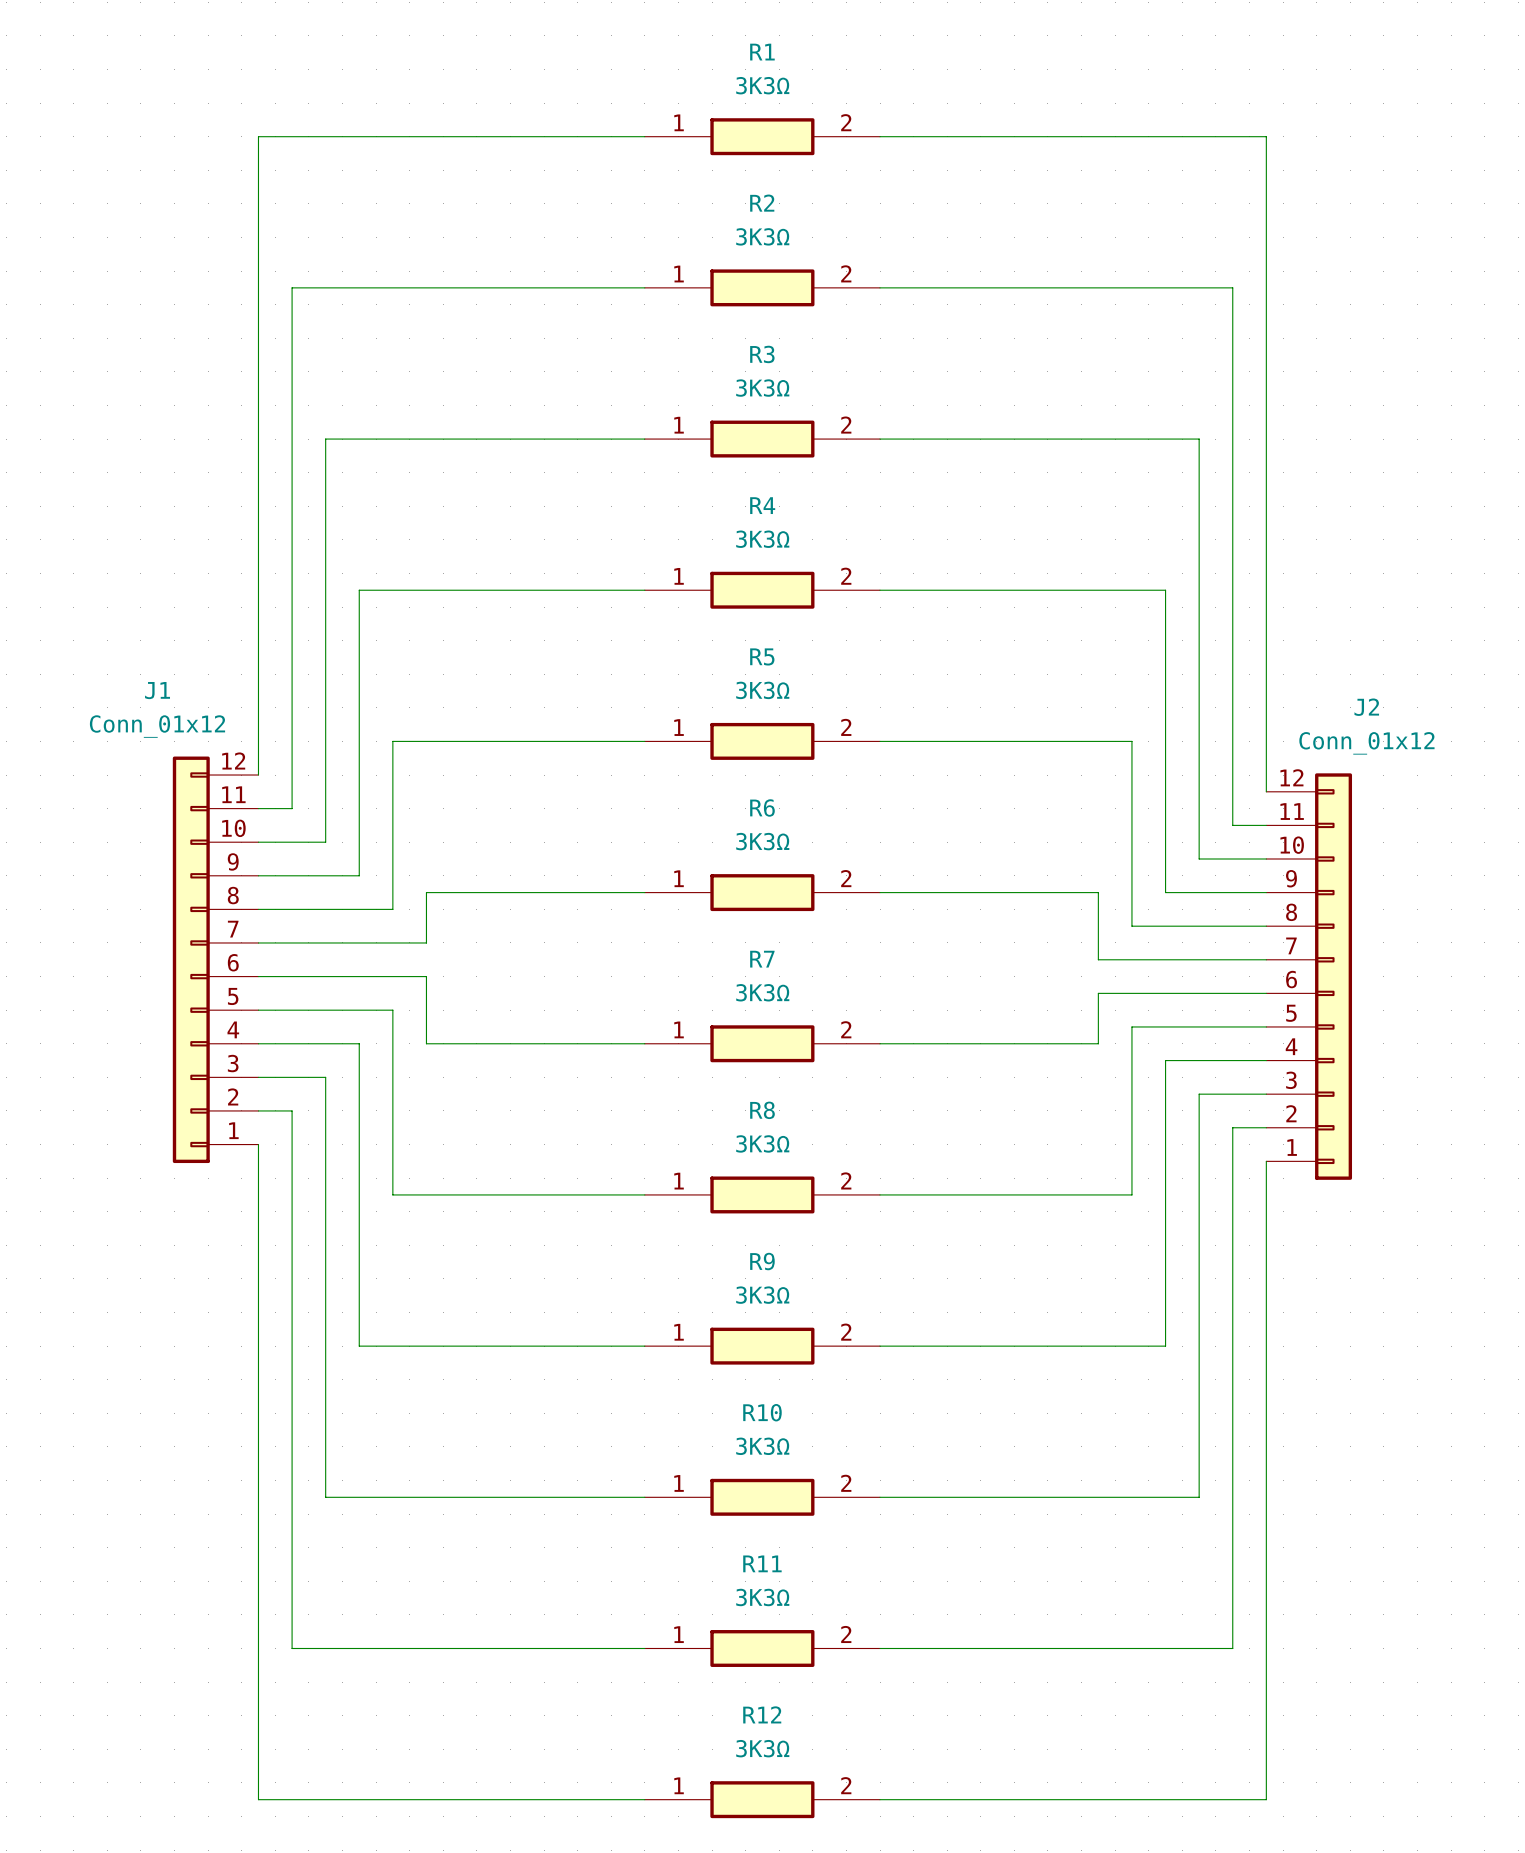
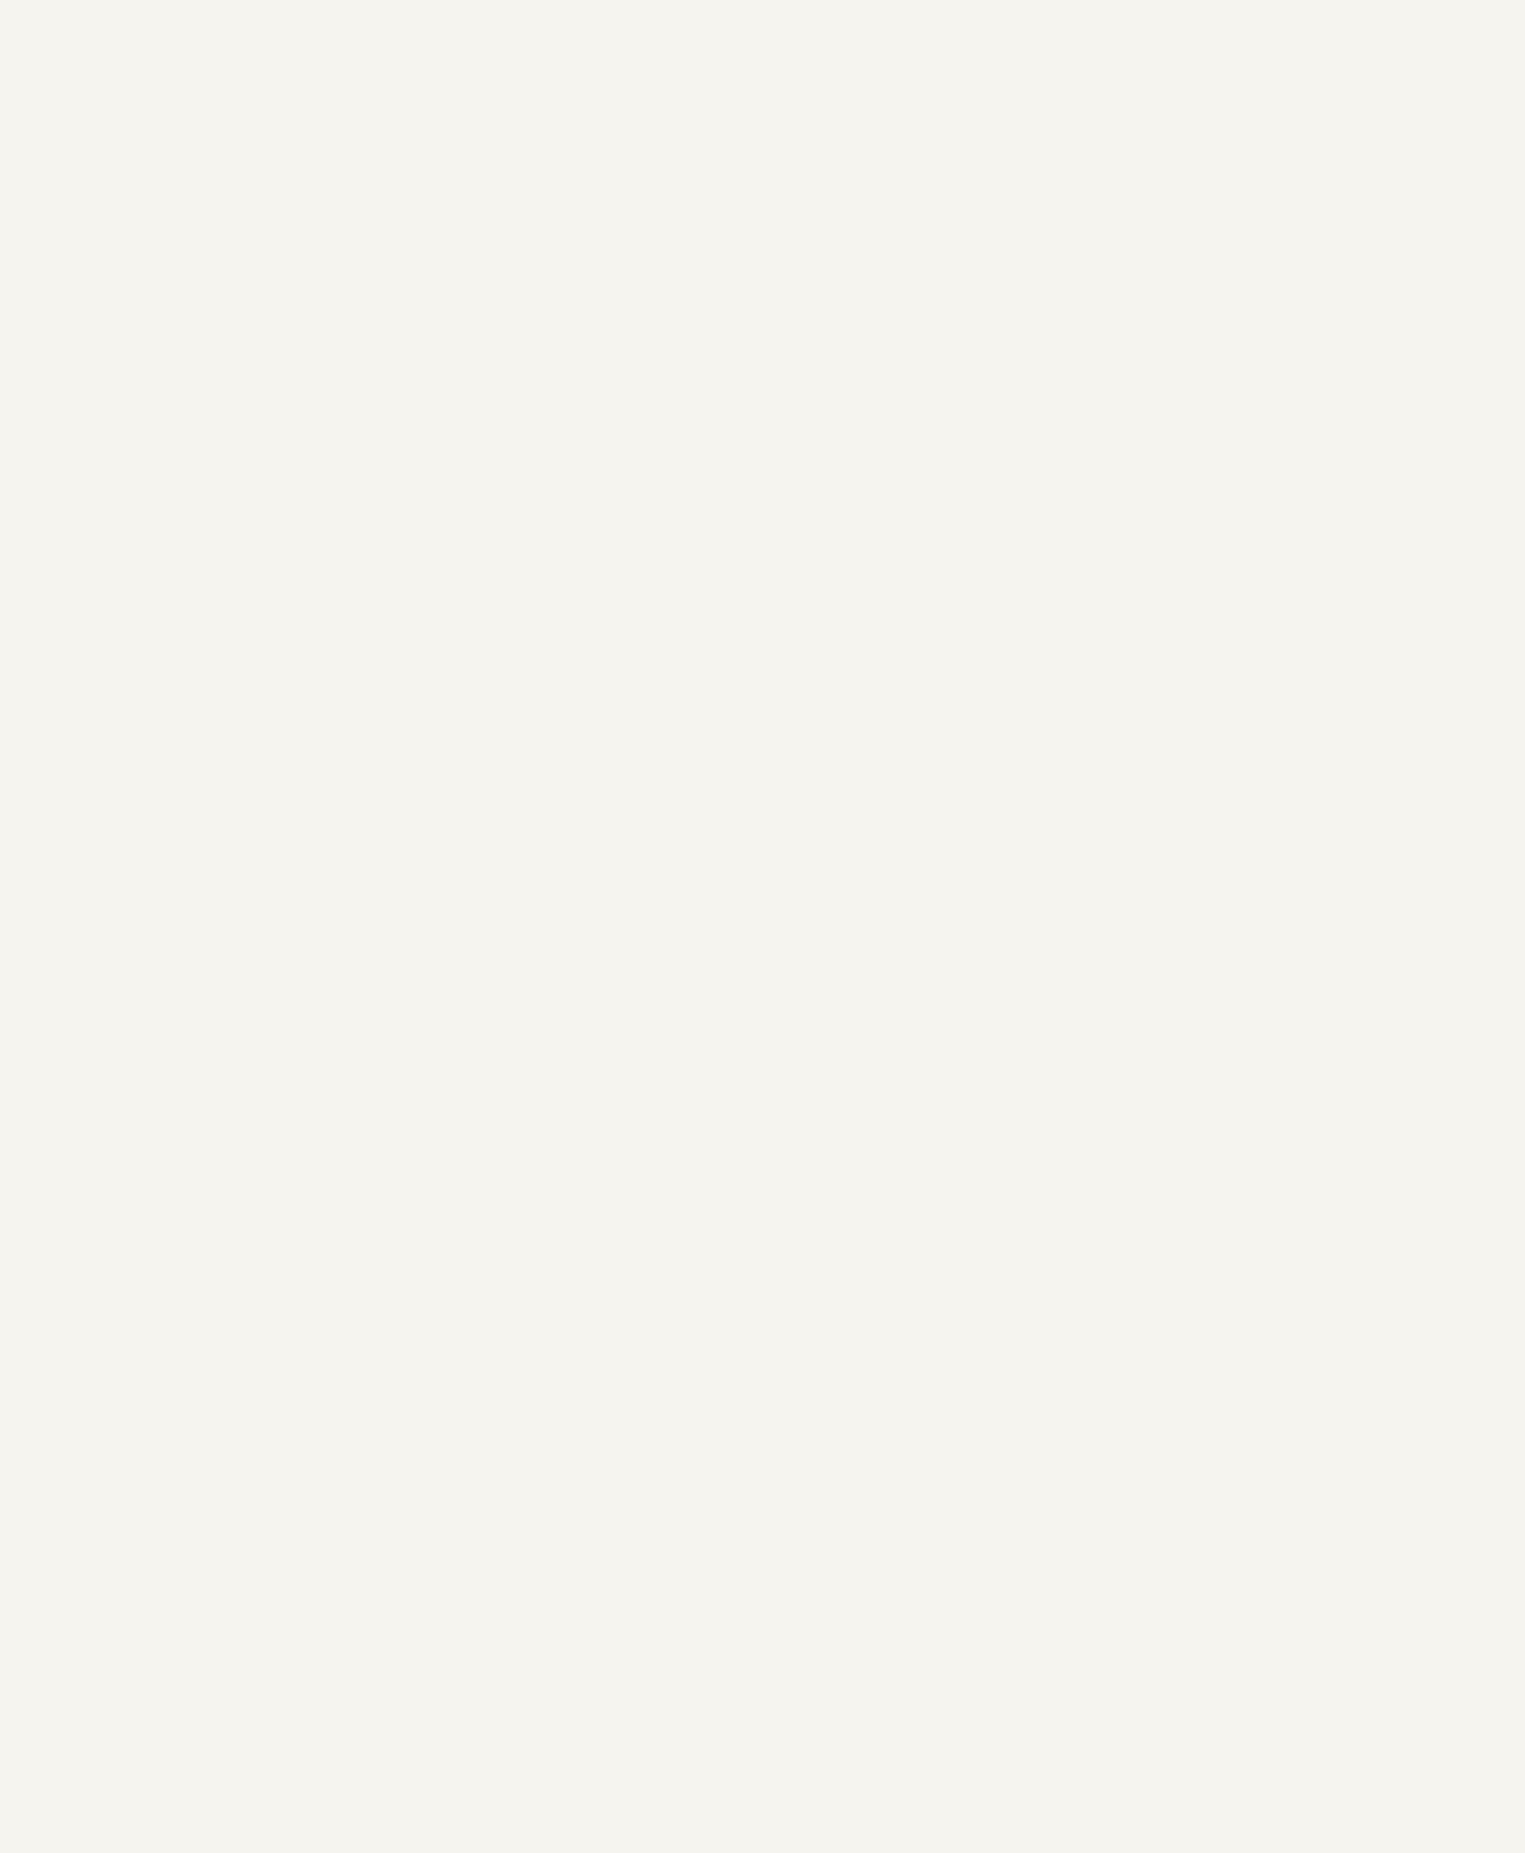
wire: (644, 136) (258, 136) (258, 775) -> none
R1: 3K3Ω (762, 136) -> none
wire: (880, 136) (1266, 136) (1266, 791) -> none
wire: (644, 287) (292, 287) (292, 808) (258, 808) -> none
R2: 3K3Ω (762, 287) -> none
wire: (880, 287) (1232, 287) (1232, 825) (1266, 825) -> none
wire: (644, 439) (325, 439) (325, 842) (258, 842) -> none
R3: 3K3Ω (762, 439) -> none
wire: (880, 439) (1199, 439) (1199, 859) (1266, 859) -> none
wire: (644, 590) (359, 590) (359, 875) (258, 875) -> none
R4: 3K3Ω (762, 590) -> none
wire: (880, 590) (1165, 590) (1165, 892) (1266, 892) -> none
wire: (644, 741) (392, 741) (392, 909) (258, 909) -> none
R5: 3K3Ω (762, 741) -> none
wire: (880, 741) (1131, 741) (1131, 926) (1266, 926) -> none
wire: (644, 892) (426, 892) (426, 942) (258, 942) -> none
R6: 3K3Ω (762, 892) -> none
wire: (880, 892) (1098, 892) (1098, 959) (1266, 959) -> none
J1: Conn_01x12 (215, 959) -> none
wire: (258, 976) (426, 976) (426, 1043) (644, 1043) -> none
J2: Conn_01x12 (1309, 976) -> none
wire: (1266, 993) (1098, 993) (1098, 1043) (880, 1043) -> none
wire: (258, 1010) (392, 1010) (392, 1194) (644, 1194) -> none
wire: (1266, 1026) (1131, 1026) (1131, 1194) (880, 1194) -> none
wire: (258, 1043) (359, 1043) (359, 1346) (644, 1346) -> none
R7: 3K3Ω (762, 1043) -> none
wire: (1266, 1060) (1165, 1060) (1165, 1346) (880, 1346) -> none
wire: (258, 1077) (325, 1077) (325, 1497) (644, 1497) -> none
wire: (1266, 1094) (1199, 1094) (1199, 1497) (880, 1497) -> none
wire: (258, 1110) (292, 1110) (292, 1648) (644, 1648) -> none
wire: (1266, 1127) (1232, 1127) (1232, 1648) (880, 1648) -> none
wire: (258, 1144) (258, 1799) (644, 1799) -> none
wire: (1266, 1161) (1266, 1799) (880, 1799) -> none
R8: 3K3Ω (762, 1194) -> none
R9: 3K3Ω (762, 1346) -> none
R10: 3K3Ω (762, 1497) -> none
R11: 3K3Ω (762, 1648) -> none
R12: 3K3Ω (762, 1799) -> none

